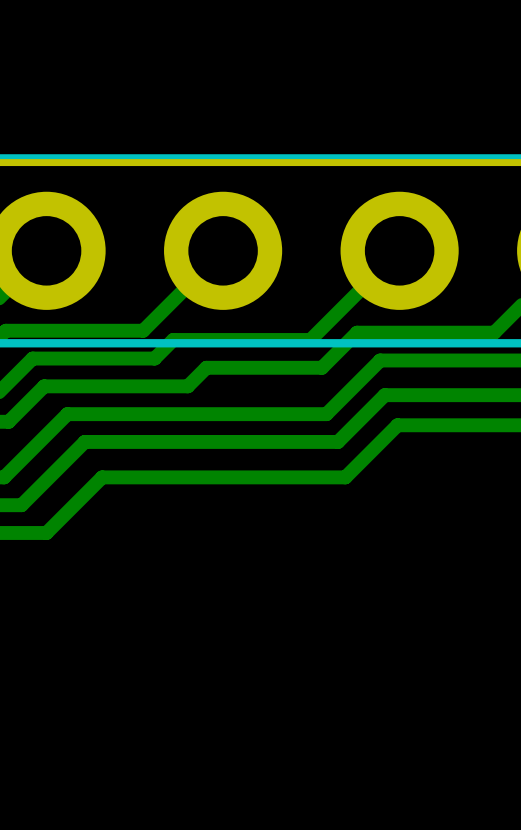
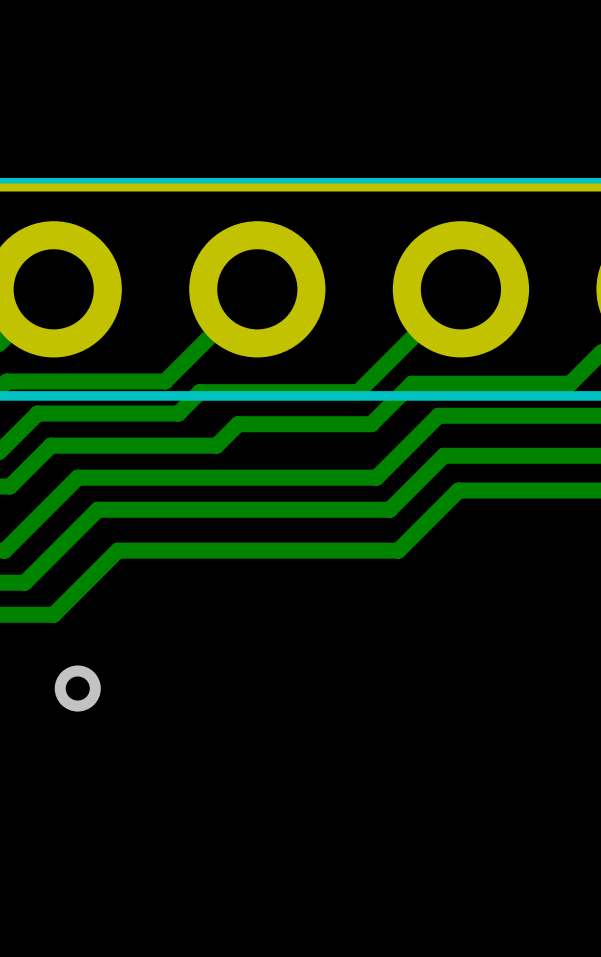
via: none -> (77, 688)

